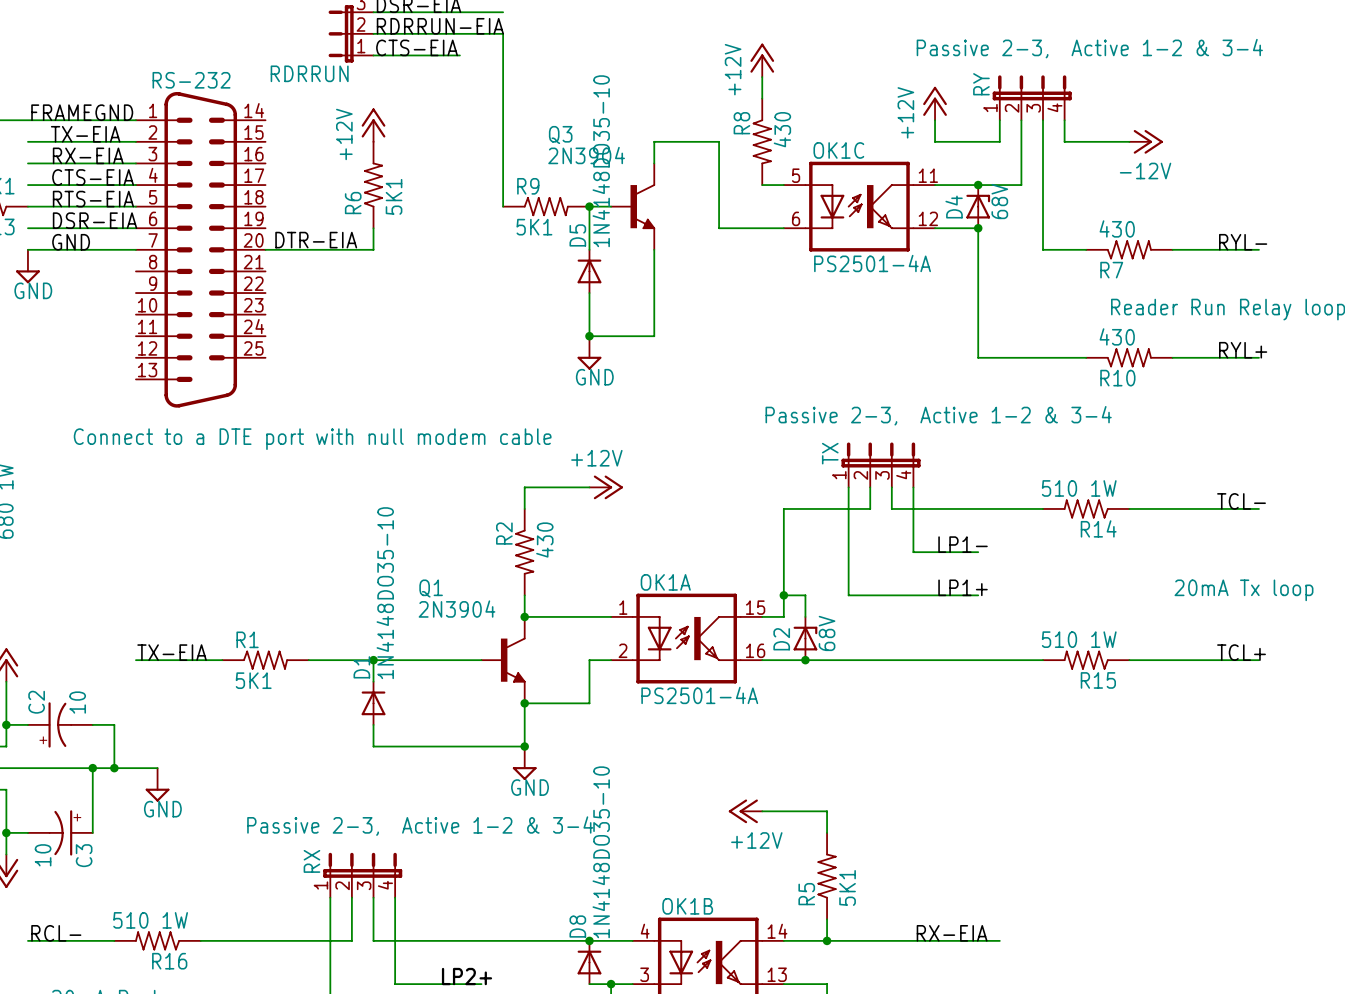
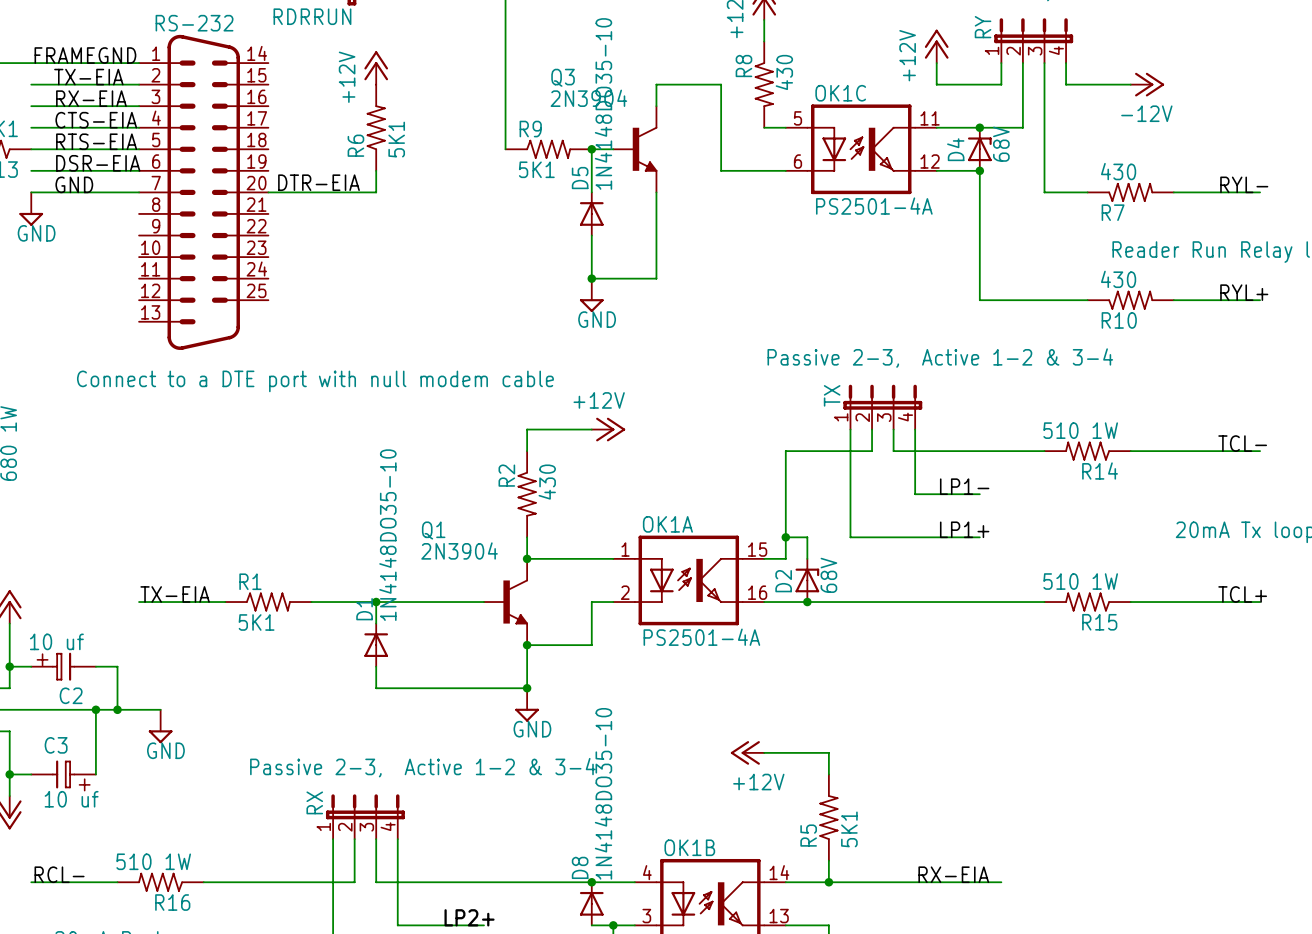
C2 symbol: [27, 702, 93, 748] -> [31, 652, 96, 681]
C2 name position: C2 (36, 702) -> C2 (71, 695)
C2 value: 10 (77, 702) -> 10 uf (56, 641)
C3 symbol: [27, 810, 93, 856] -> [31, 760, 96, 789]
C3 value: 10 (43, 855) -> 10 uf (71, 799)
C3 name position: C3 (84, 855) -> C3 (56, 745)

